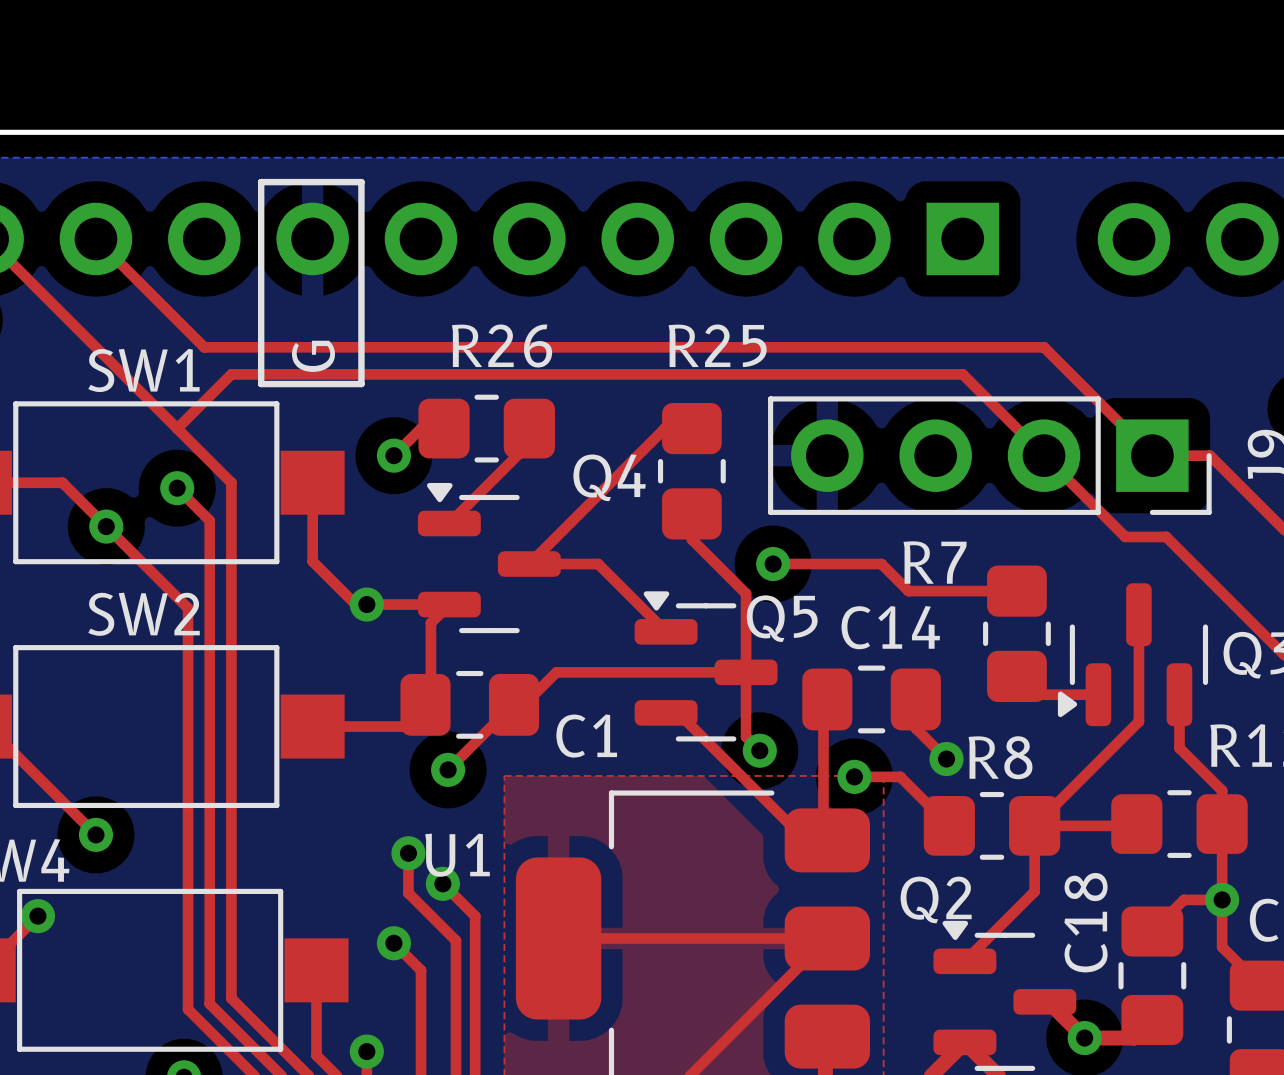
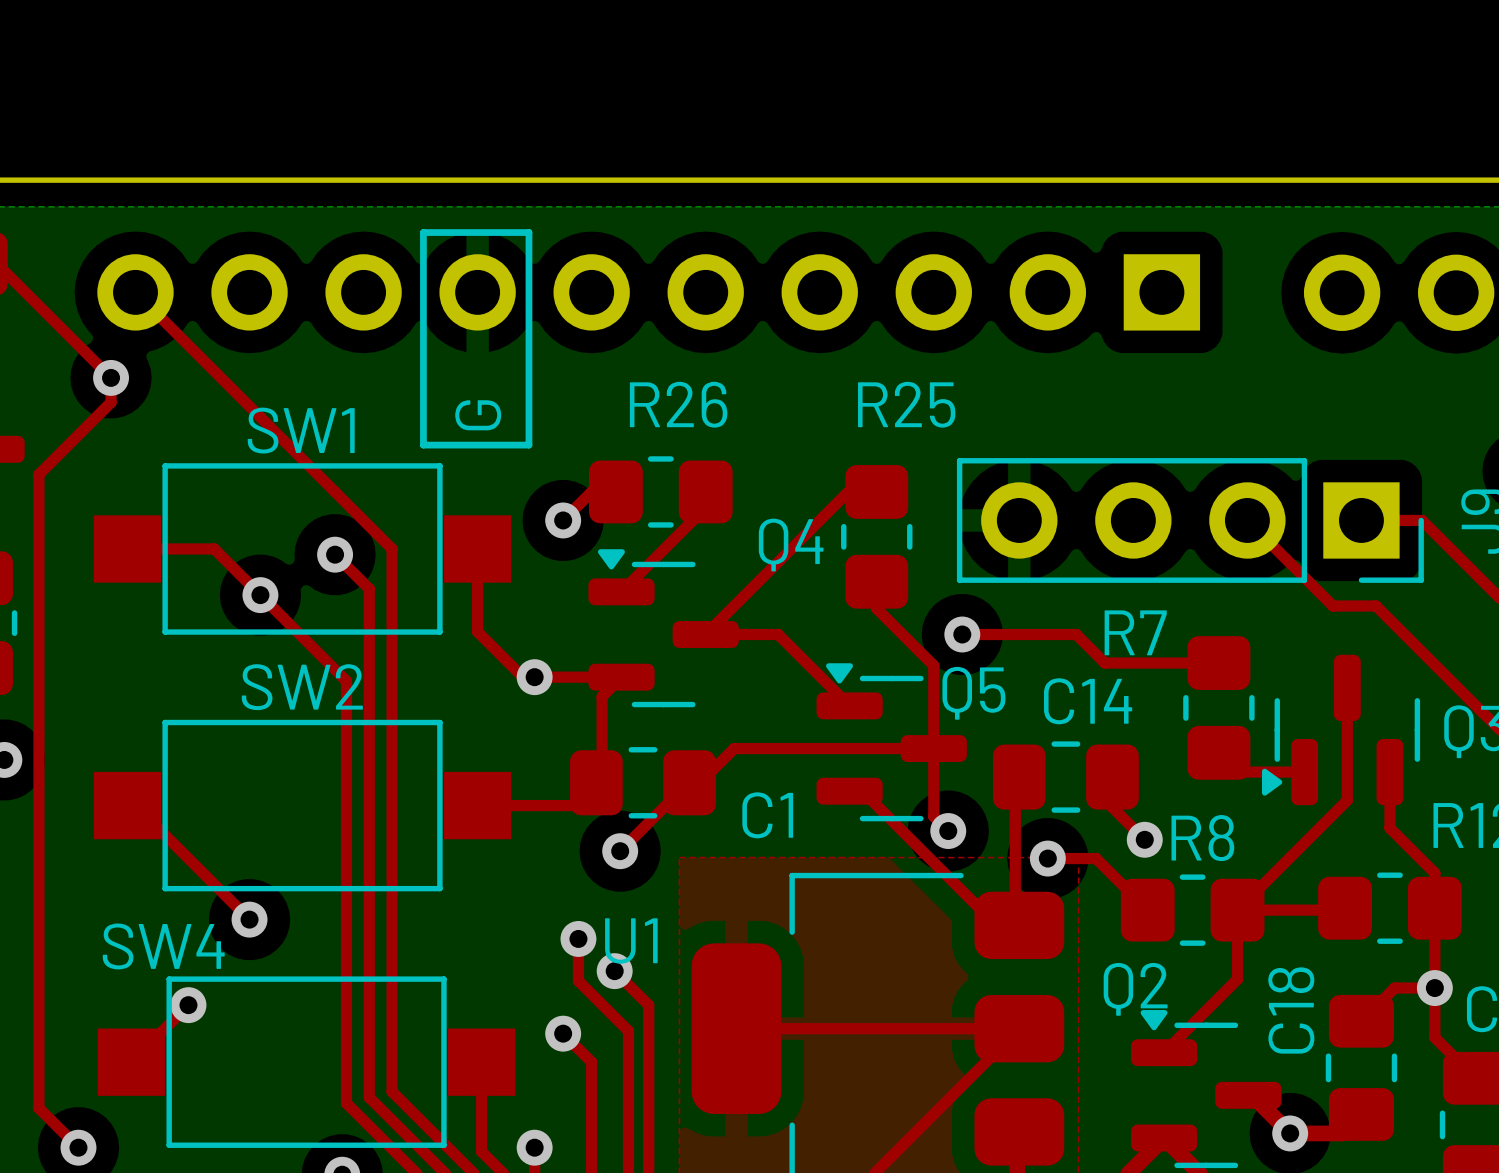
top track: (95, 238) (204, 347) (1044, 347) (1152, 455) -> none
top track: (177, 428) (231, 374) (962, 374) (1044, 455) -> none

